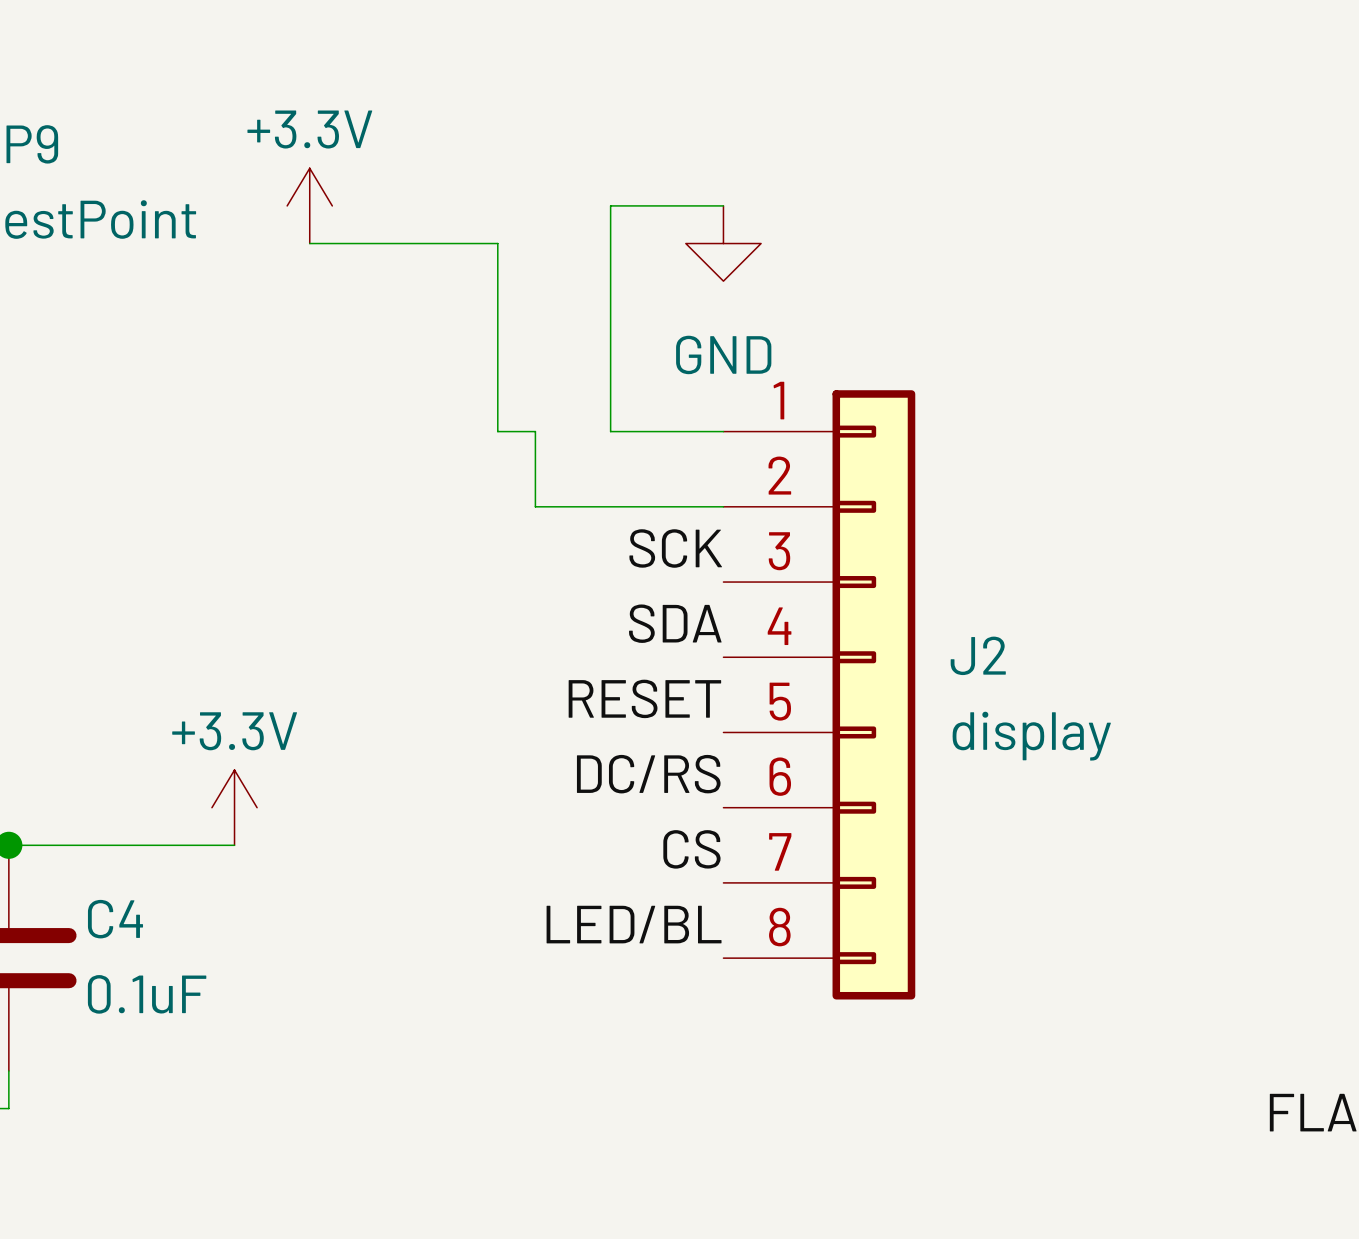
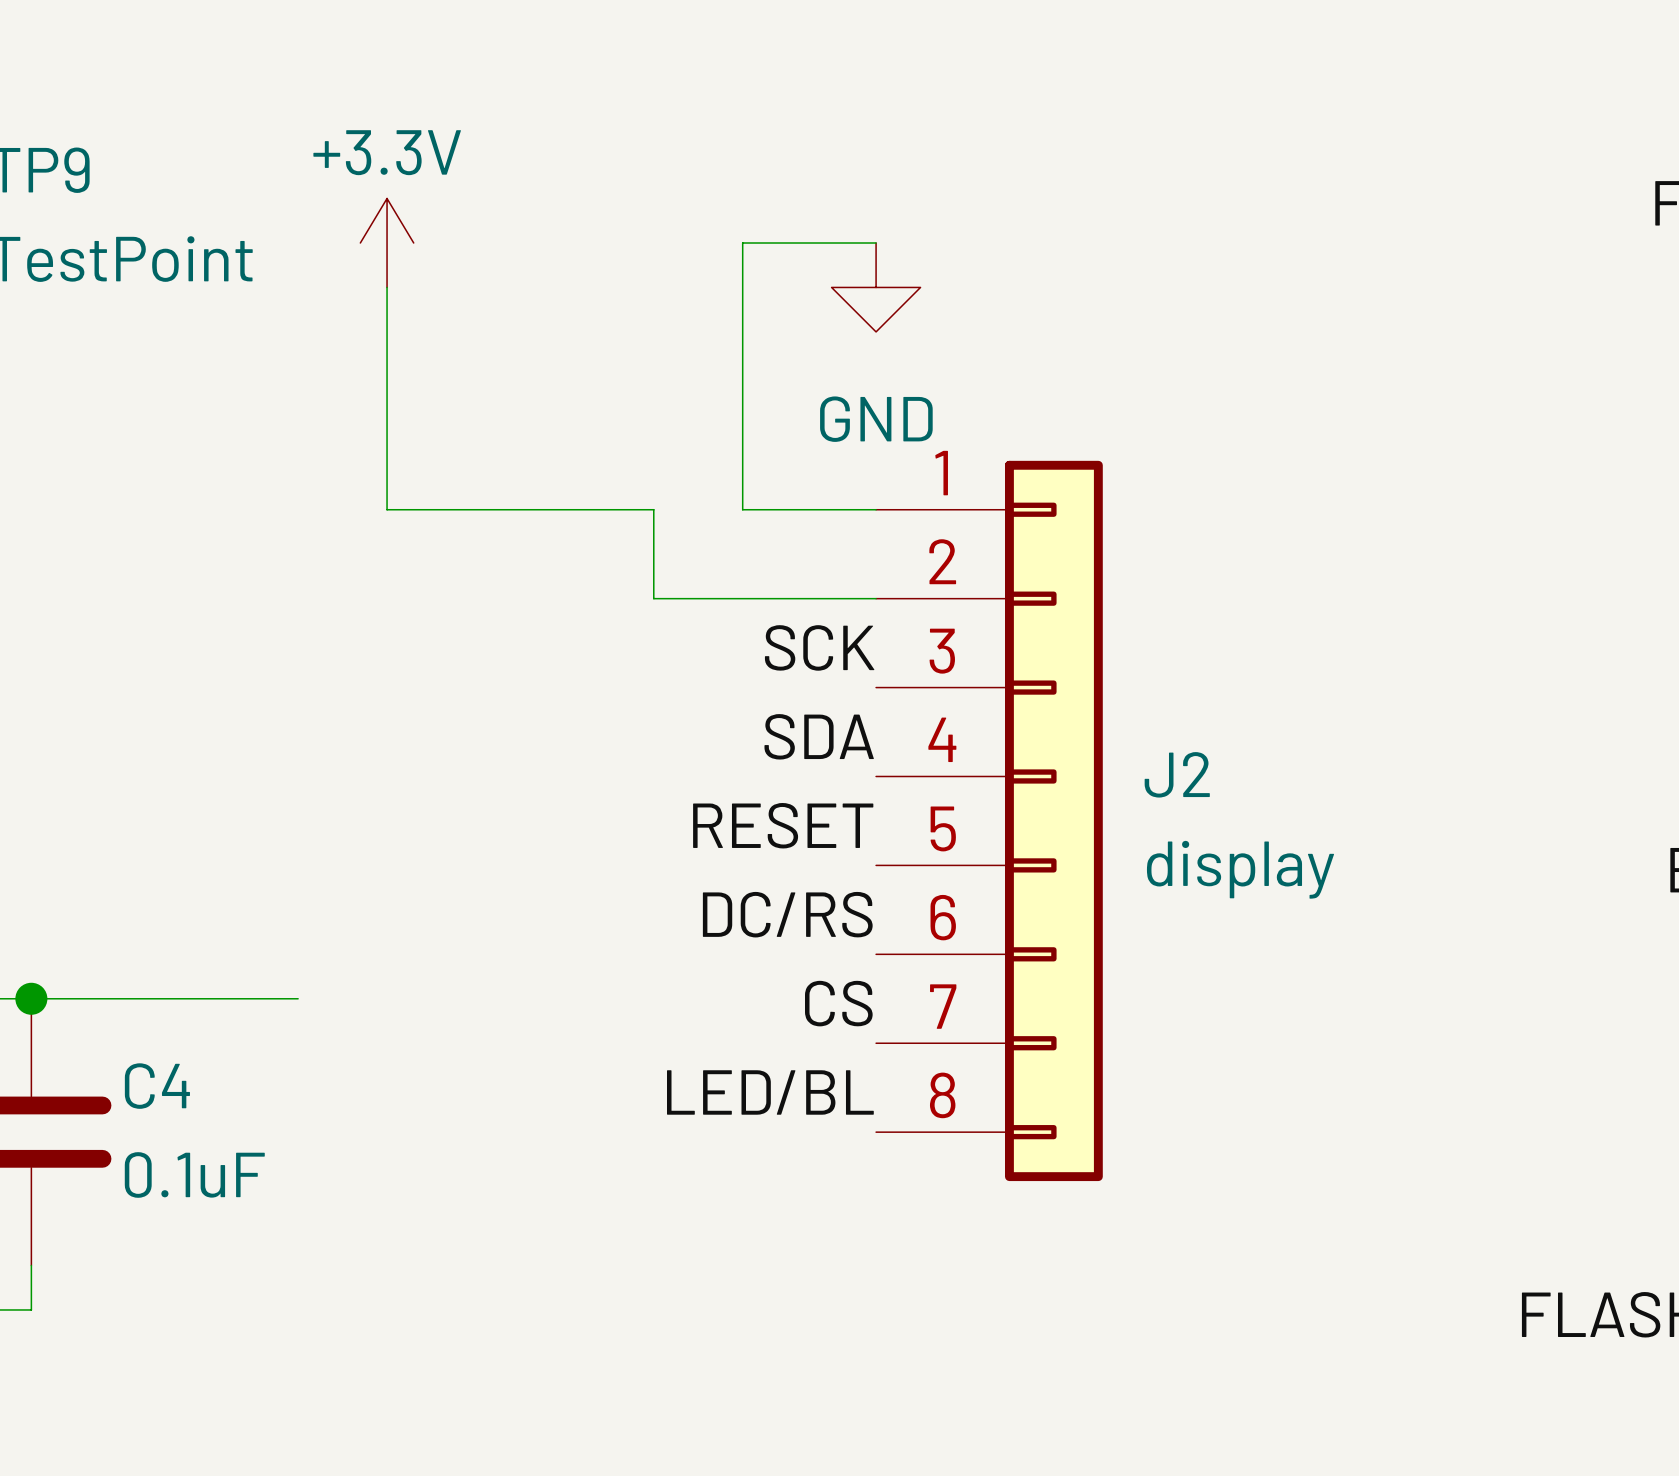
wire: (309, 243) (497, 243) (497, 431) -> (387, 287) (387, 509) (609, 509)
power symbol: +3.3V (234, 807) -> none

